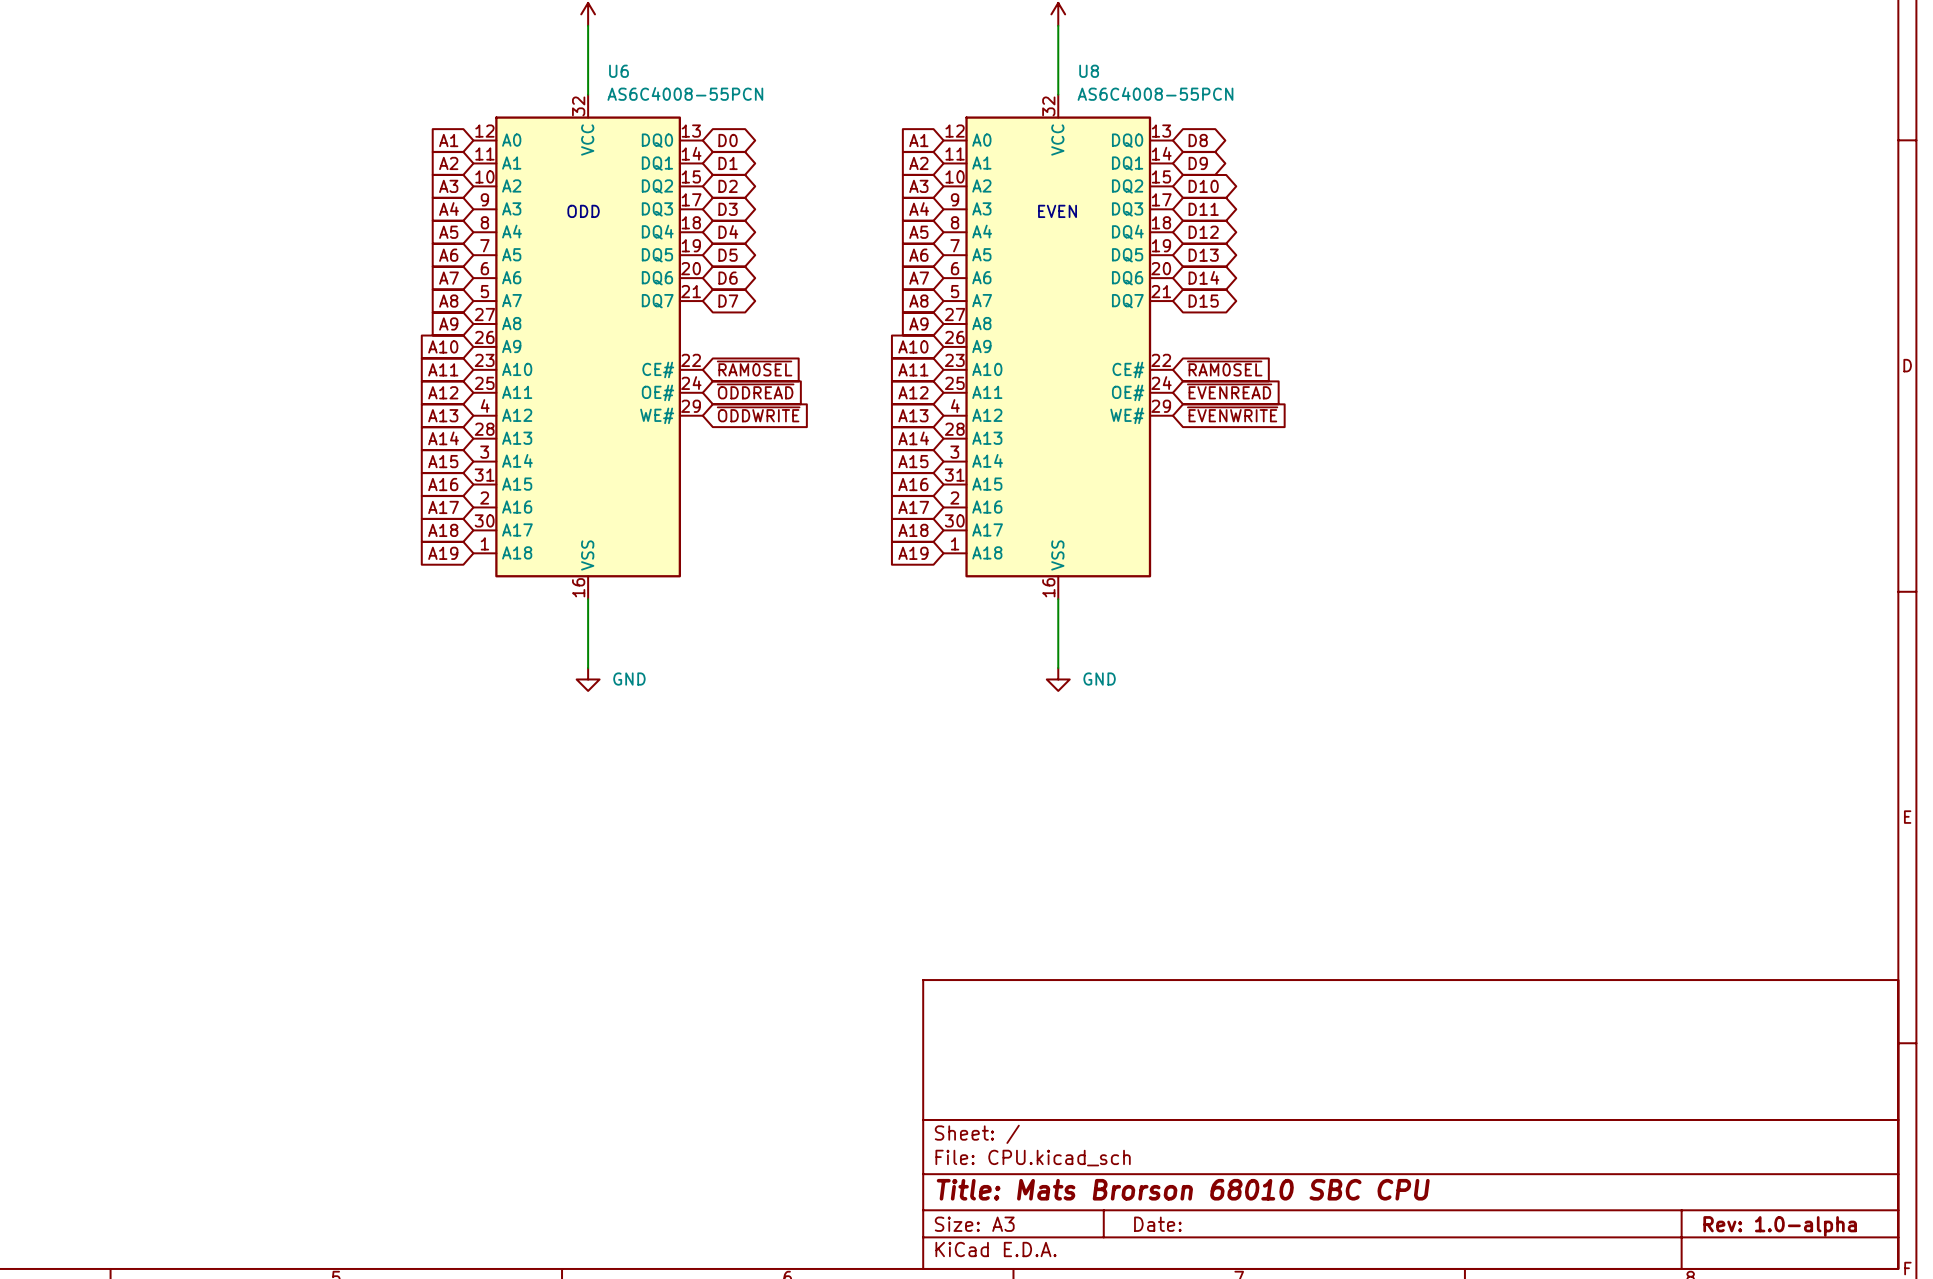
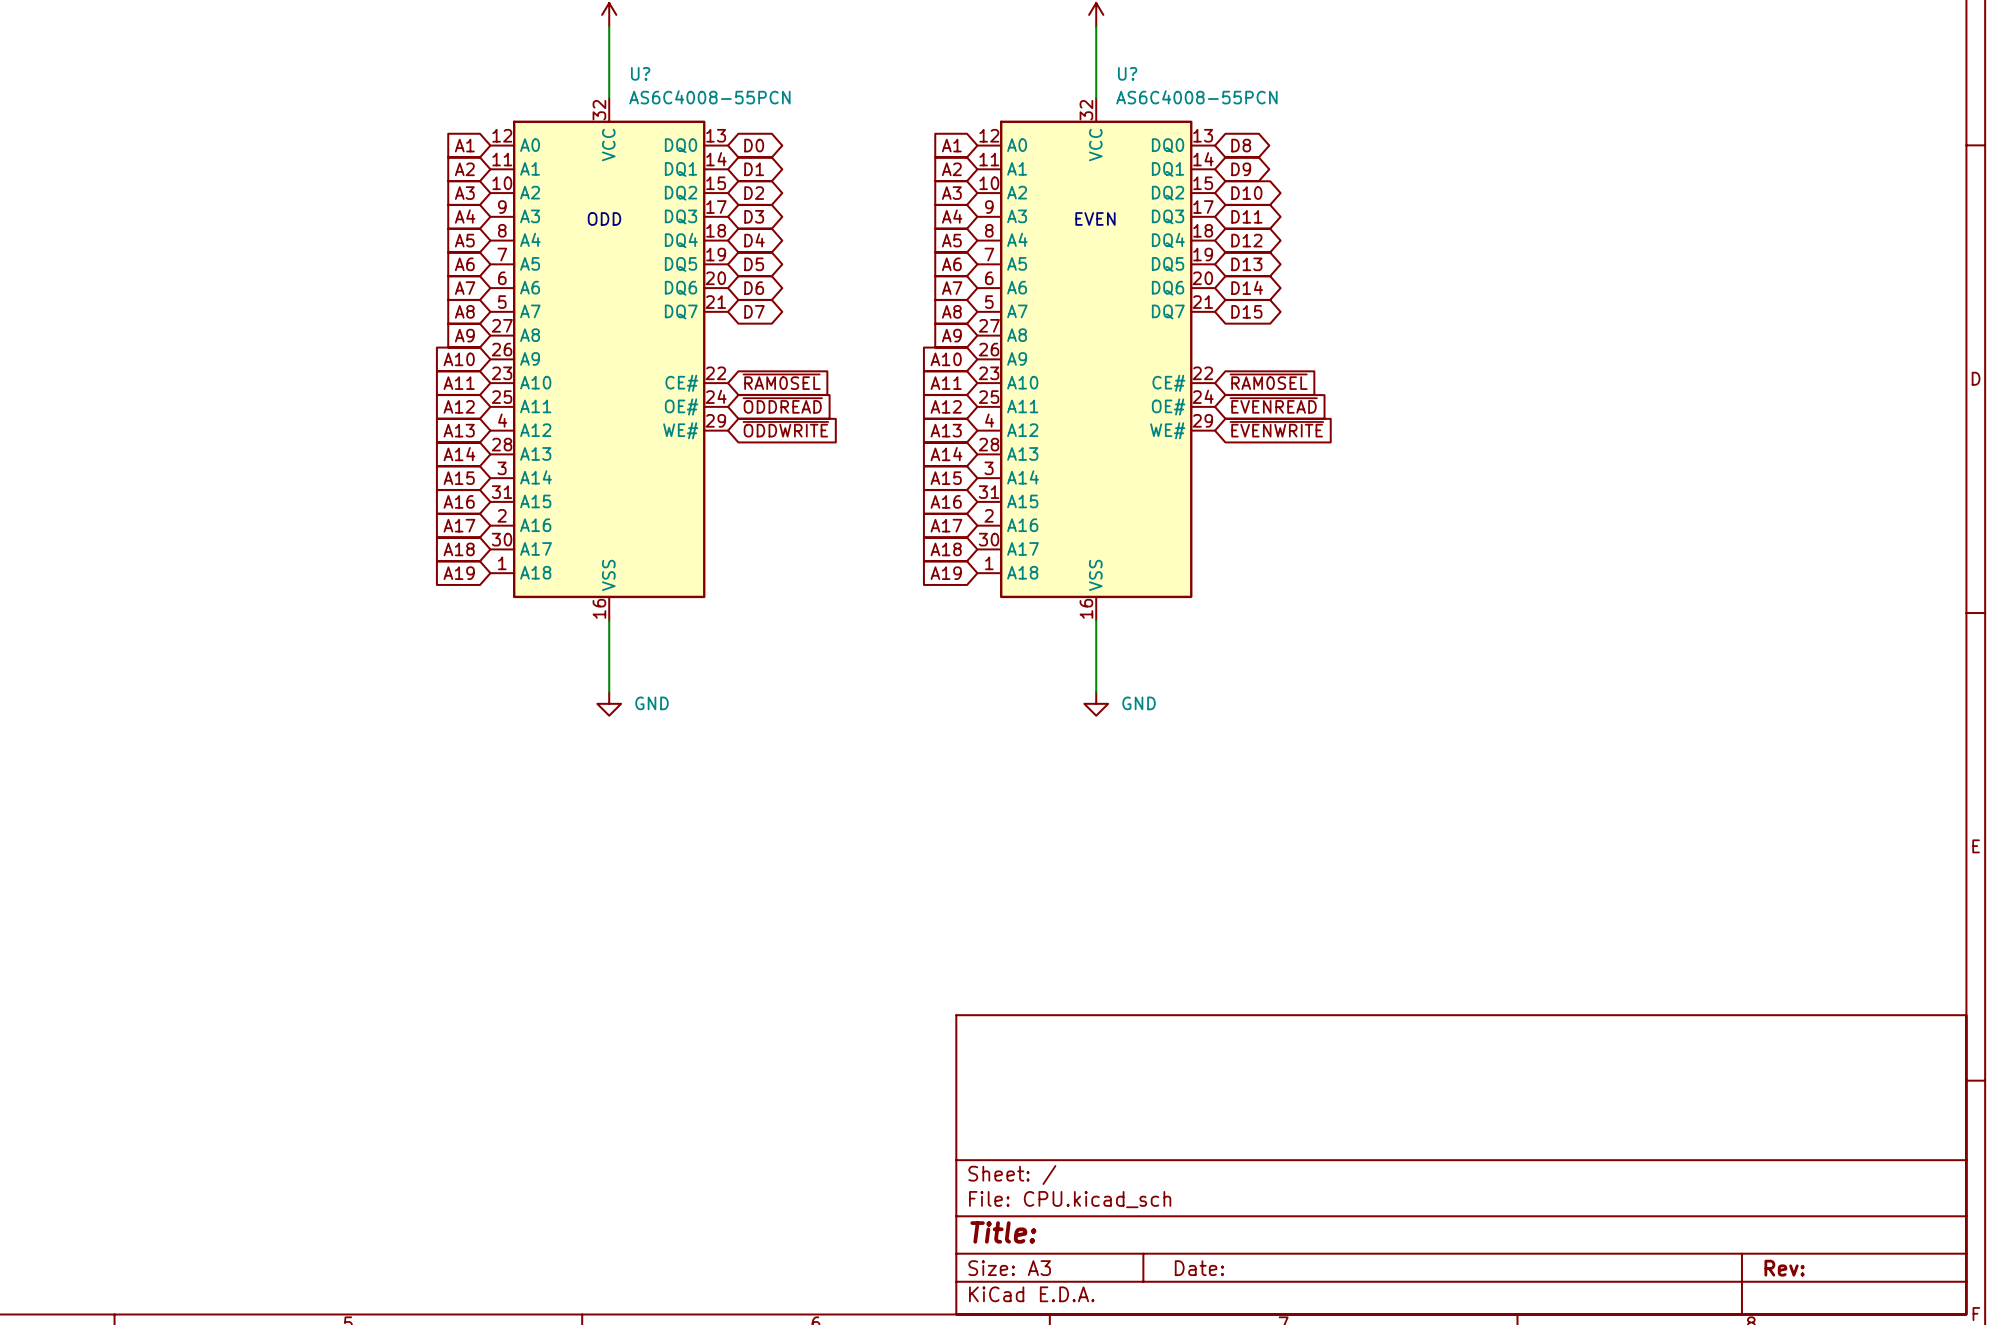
U6 name: U6 (619, 71) -> U? (640, 73)
U8 name: U8 (1089, 71) -> U? (1127, 73)
title block: Title: Mats Brorson 68010 SBC CPU (1183, 1189) -> Title: (1003, 1232)
title block: Rev: 1.0-alpha (1780, 1226) -> Rev: (1784, 1268)

